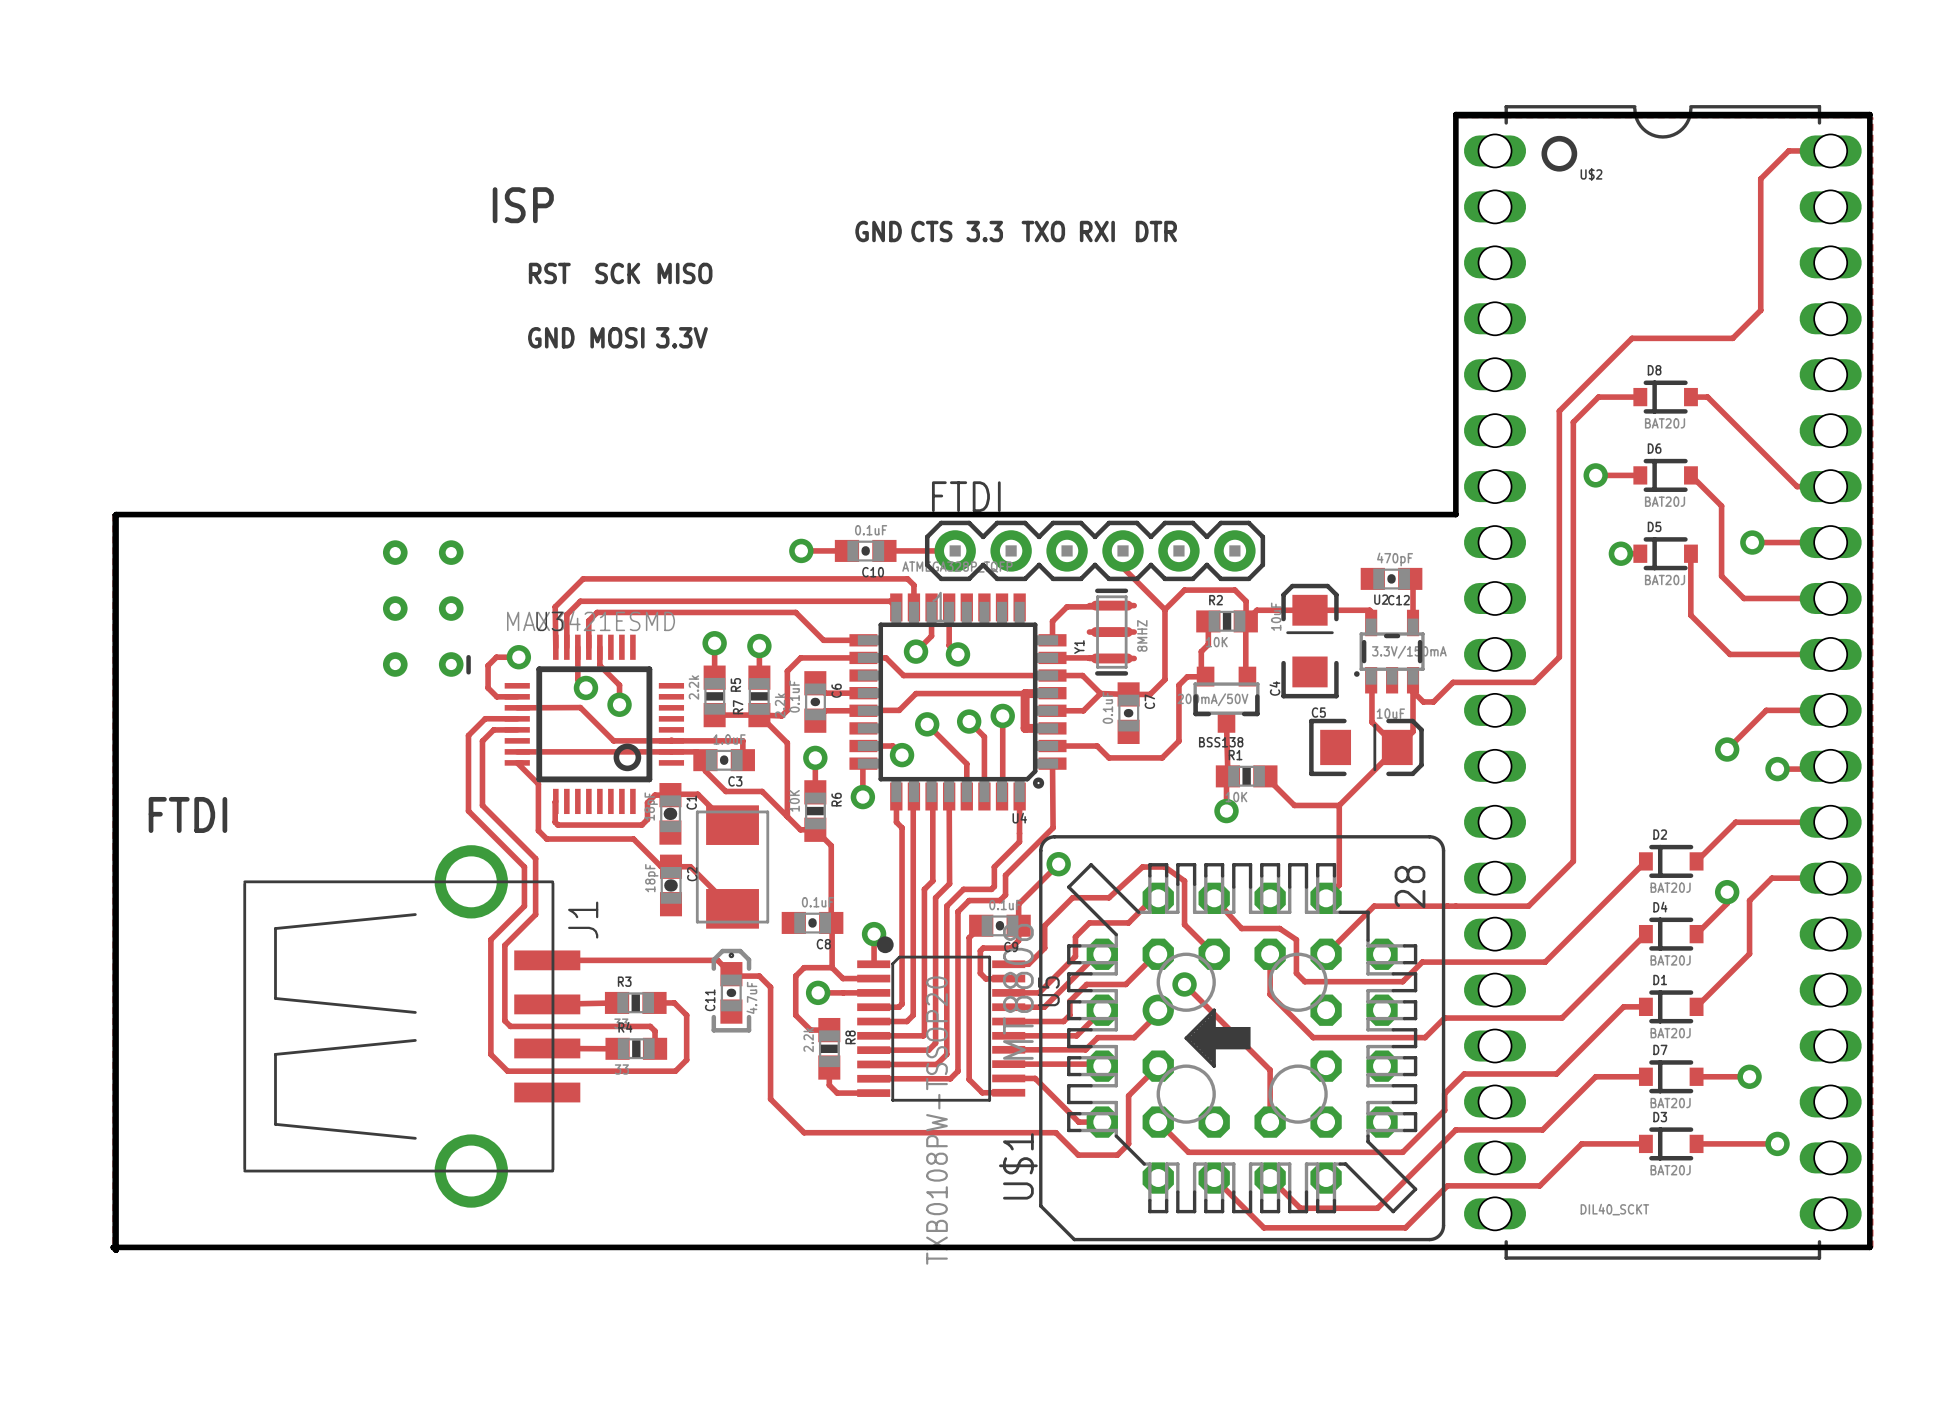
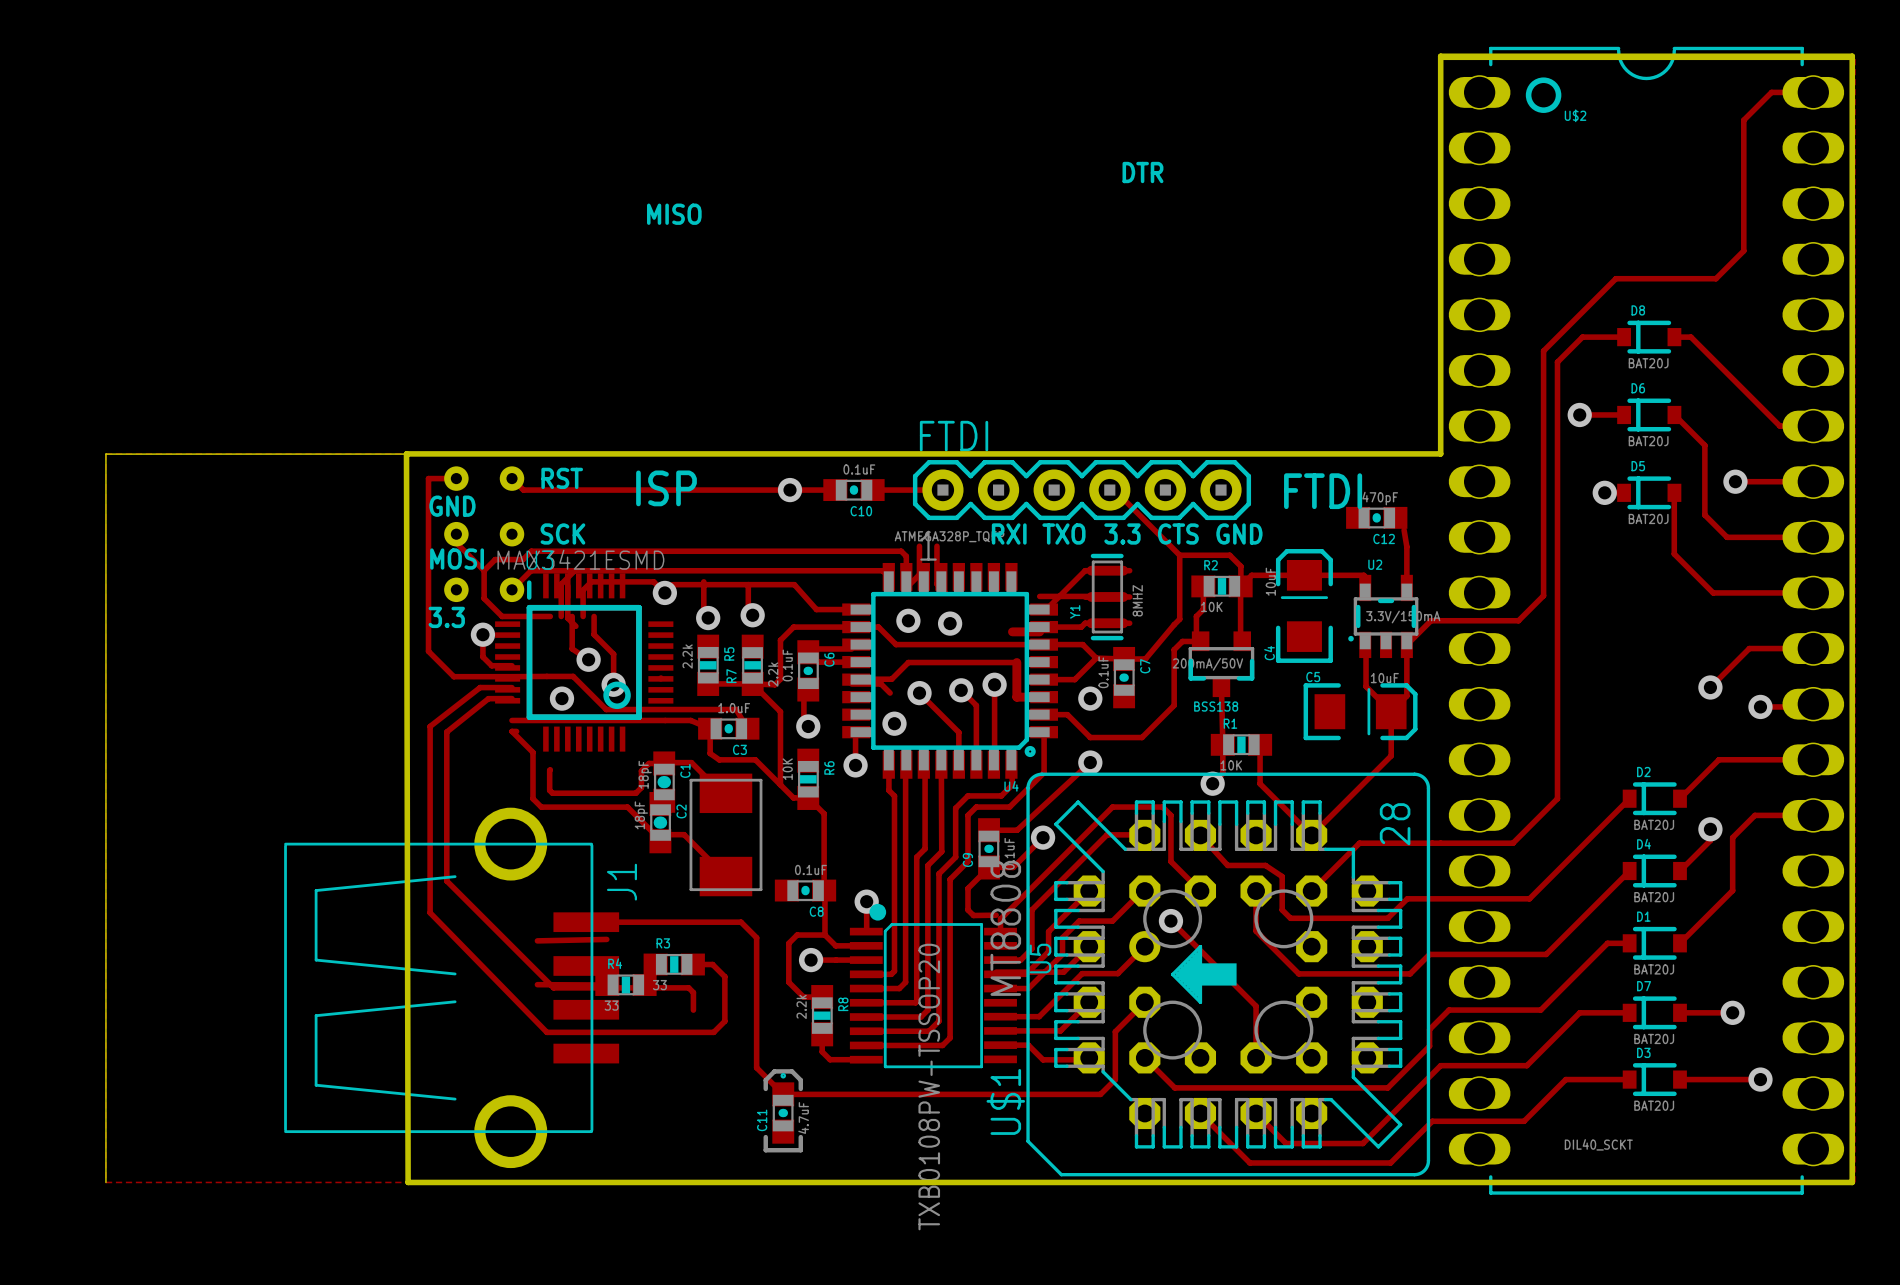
text position: ISP (523, 205) -> ISP (666, 488)
text: GND (878, 231) -> none
text position: CTS (931, 231) -> CTS (1178, 533)
text: 3.3 (984, 231) -> none
text position: TXO (1043, 231) -> TXO (1063, 533)
text position: RXI (1097, 231) -> RXI (1009, 533)
text position: RST (549, 273) -> RST (562, 478)
text position: SCK (617, 273) -> SCK (562, 533)
text position: GND (551, 337) -> GND (452, 506)
text position: MOSI (617, 337) -> MOSI (457, 559)
text: 3.3V (681, 337) -> none
board edge: (415, 514) (116, 514) (116, 1250) (113, 1247) (417, 1247) -> (406, 453) (408, 1182)
track: none -> (456, 478) (428, 478) (428, 651) (453, 676) (573, 676) (606, 709) (736, 709) (747, 728)
track: none -> (512, 478) (523, 490) (790, 490)
track: (1123, 550) (1123, 567) (1164, 609) -> none
track: none -> (1118, 490) (1118, 494) (1179, 555)
text: none -> FTDI (1323, 491)
track: (1410, 578) (1413, 581) (1413, 622) -> none
track: none -> (1404, 530) (1406, 546) (1406, 587)
track: none -> (456, 534) (456, 542) (484, 570)
text: none -> 3.3 (1122, 533)
text: none -> GND (1239, 533)
track: (1111, 605) (1067, 606) (1052, 621) (1052, 640) -> none
track: (896, 607) (890, 601) (580, 601) (566, 614) (566, 647) -> none
track: (913, 607) (913, 585) (907, 578) (583, 578) (555, 606) (555, 647) -> none
part position: (426, 608) -> (487, 534)
track: (1164, 609) (1164, 679) (1150, 694) (1100, 693) -> none
track: (1164, 609) (1184, 590) (1234, 590) (1246, 601) (1246, 621) -> none
track: (597, 612) (588, 620) (588, 647) -> (587, 551) (531, 551) (523, 559) (495, 559) (484, 570)
track: (795, 612) (823, 640) (863, 640) -> (784, 551) (901, 551) (906, 556) (906, 576)
track: none -> (1179, 555) (1179, 619) (1145, 659) (1096, 658)
track: none -> (1179, 555) (1229, 555) (1240, 566) (1240, 586)
track: (1208, 621) (1208, 644) (1201, 651) (1201, 672) (1205, 676) -> (1203, 586) (1203, 609) (1196, 616) (1196, 637) (1200, 641)
R2 position: (1227, 621) -> (1221, 586)
track: (1371, 622) (1371, 612) (1369, 610) (1256, 610) (1245, 621) (1245, 674) (1247, 676) -> (1365, 587) (1366, 577) (1363, 575) (1251, 575) (1240, 586) (1240, 639) (1242, 641)
track: none -> (484, 570) (484, 598) (502, 616) (550, 616)
track: none -> (574, 570) (561, 584) (561, 616)
track: none -> (1085, 570) (1046, 609) (1044, 609)
Y1 position: (1111, 632) -> (1107, 597)
track: none -> (888, 576) (882, 570) (531, 570) (512, 589)
C4 position: (1309, 641) -> (1304, 605)
via: (714, 643) -> none
via: (759, 646) -> none
track: (599, 647) (599, 665) (619, 685) (619, 704) -> none
via: (916, 651) -> none
U2 position: (1389, 651) -> (1383, 616)
via: none -> (664, 592)
via: (957, 654) -> none
track: (518, 657) (496, 657) (488, 665) (488, 687) (496, 696) (517, 696) -> none
via: (518, 657) -> none
track: none -> (856, 609) (816, 609) (794, 584) (673, 584) (664, 592) (653, 581) (591, 581) (583, 590) (583, 616)
via: none -> (752, 615)
track: (1205, 676) (1187, 676) (1178, 685) (1178, 741) (1162, 757) (1109, 757) (1097, 746) (1052, 746) -> none
track: none -> (572, 616) (572, 648) (588, 659)
track: none -> (594, 616) (594, 634) (613, 654) (613, 684)
text: none -> 3.3 (446, 617)
via: none -> (708, 618)
track: (1371, 680) (1371, 722) (1397, 747) -> (1365, 644) (1366, 686) (1391, 711)
via: none -> (908, 620)
track: (1453, 682) (1433, 701) (1423, 701) (1412, 690) (1412, 680) (1413, 680) (1413, 731) (1339, 805) -> (1437, 620) (1431, 620) (1406, 644)
track: (815, 683) (825, 693) (863, 693) -> (808, 652) (818, 662) (856, 662)
track: none -> (1085, 623) (1081, 627) (1044, 627)
via: none -> (950, 623)
via: (585, 687) -> none
track: (1100, 693) (1082, 675) (903, 675) (885, 657) (800, 657) (787, 671) (787, 710) (781, 715) (759, 715) -> none
track: (1100, 693) (1083, 710) (1052, 710) -> none
track: none -> (482, 634) (482, 656) (491, 665) (511, 665)
via: none -> (482, 634)
R5 position: (714, 696) -> (708, 665)
R7 position: (759, 696) -> (752, 665)
BSS138 position: (1226, 699) -> (1221, 664)
C6 position: (815, 701) -> (808, 670)
U4 position: (957, 701) -> (950, 670)
track: none -> (1200, 641) (1182, 641) (1174, 649) (1174, 705) (1142, 737) (1090, 737) (1067, 714) (1044, 714)
via: (619, 704) -> none
track: none -> (1406, 644) (1406, 696) (1391, 711)
track: (517, 707) (580, 707) (613, 740) (742, 740) (742, 760) -> none
track: (863, 710) (899, 710) (916, 693) (1025, 693) (1025, 728) (1052, 728) -> (856, 679) (891, 679) (908, 662) (1016, 662) (1016, 697) (1044, 697)
C7 position: (1128, 713) -> (1124, 677)
track: (714, 715) (759, 715) -> (708, 683) (752, 683)
track: (759, 715) (787, 743) (787, 816) -> (752, 683) (780, 711) (780, 784)
track: (1002, 715) (1002, 796) -> (994, 684) (993, 764)
via: (1002, 715) -> none
track: (517, 718) (485, 718) (468, 735) (468, 811) (524, 867) (524, 906) (490, 939) (490, 1054) (507, 1071) (675, 1071) (686, 1060) (686, 1015) (674, 1002) (654, 1002) -> none
track: none -> (1096, 658) (1082, 644) (896, 644) (878, 627) (793, 627) (780, 640) (780, 679) (774, 684) (752, 683)
track: none -> (1096, 658) (1074, 679) (1044, 679)
via: none -> (588, 659)
track: (969, 721) (984, 736) (984, 796) -> (961, 690) (976, 705) (976, 764)
via: (969, 721) -> none
track: (1226, 722) (1226, 811) -> none
track: (927, 724) (966, 763) (966, 796) -> (919, 693) (958, 732) (958, 764)
via: (927, 724) -> none
track: (517, 729) (493, 729) (482, 741) (482, 805) (535, 858) (535, 914) (504, 945) (504, 1020) (510, 1026) (650, 1026) (655, 1031) (655, 1048) -> none
via: none -> (613, 684)
via: none -> (994, 684)
C5 position: (1366, 747) -> (1360, 711)
track: none -> (511, 687) (480, 687) (430, 726) (430, 912) (546, 1032) (713, 1032) (724, 1021) (724, 976) (712, 964) (692, 964)
track: none -> (1221, 687) (1222, 773) (1212, 783)
track: (517, 751) (697, 751) (705, 760) (705, 771) (725, 791) (762, 791) (800, 829) (815, 829) (831, 845) (832, 967) -> none
via: none -> (961, 690)
via: (902, 755) -> none
via: none -> (919, 693)
via: (815, 757) -> none
track: none -> (511, 698) (488, 698) (446, 732) (446, 881) (553, 987) (688, 987) (693, 992) (693, 1010)
via: none -> (561, 698)
C3 position: (724, 760) -> (728, 728)
via: none -> (1090, 698)
track: (521, 762) (517, 762) (538, 784) (538, 830) (546, 839) (633, 839) (661, 866) (690, 866) (732, 908) -> (516, 731) (511, 731) (533, 752) (533, 798) (541, 807) (627, 807) (655, 834) (684, 834) (725, 876)
track: (863, 763) (862, 797) -> (856, 732) (855, 765)
track: (1052, 763) (1053, 827) (1005, 875) (1005, 894) (999, 900) (969, 900) (957, 911) (957, 1071) (950, 1078) (873, 1078) -> none
R1 position: (1246, 776) -> (1241, 744)
track: (1265, 776) (1294, 805) (1339, 805) -> none
track: none -> (511, 720) (690, 720) (710, 728) (710, 753) (719, 759) (755, 759) (793, 797) (808, 797) (824, 813) (824, 935)
via: none -> (894, 723)
via: none -> (808, 726)
track: none -> (1044, 732) (1044, 772) (1009, 807) (976, 807) (967, 815) (967, 861) (950, 879) (950, 1037) (942, 1045) (866, 1045)
track: (896, 796) (896, 822) (902, 827) (902, 1004) (898, 1007) (873, 1007) -> (888, 764) (888, 790) (894, 796) (894, 971) (891, 974) (866, 974)
track: (913, 796) (913, 1015) (906, 1021) (873, 1021) -> (906, 764) (905, 982) (899, 988) (866, 988)
track: (931, 796) (932, 880) (924, 889) (924, 1034) (873, 1035) -> (923, 764) (925, 848) (916, 857) (916, 1001) (866, 1002)
track: (949, 796) (949, 883) (935, 897) (935, 1043) (928, 1050) (873, 1050) -> (941, 764) (941, 851) (927, 865) (927, 1010) (920, 1017) (866, 1017)
track: (1019, 796) (1019, 841) (994, 867) (994, 886) (991, 889) (963, 889) (946, 906) (946, 1054) (936, 1064) (873, 1064) -> none
via: (862, 797) -> none
track: (555, 801) (555, 822) (558, 825) (641, 825) (647, 819) (647, 802) (655, 795) (697, 794) (728, 825) (732, 825) -> (550, 769) (549, 790) (552, 793) (635, 793) (641, 787) (641, 770) (648, 763) (691, 762) (722, 793) (725, 793)
track: (1339, 805) (1339, 885) -> (1391, 711) (1391, 755) (1324, 822)
track: none -> (1260, 744) (1260, 783) (1311, 835)
R6 position: (815, 811) -> (808, 779)
via position: (1226, 811) -> (1212, 783)
C1 position: (670, 813) -> (664, 782)
text: FTDI (187, 814) -> none
track: none -> (1090, 762) (1017, 830) (989, 830)
via: none -> (1090, 762)
via: none -> (855, 765)
track: none -> (1011, 764) (1012, 784) (1001, 795) (967, 795) (955, 808) (955, 857) (938, 873) (938, 1021) (928, 1031) (866, 1031)
track: (1058, 864) (1018, 904) (1018, 940) (1011, 948) (983, 948) (980, 951) -> (1043, 837) (1013, 867) (989, 867) (967, 888)
via: (1058, 864) -> none
part position: (732, 867) -> (725, 834)
track: (1184, 880) (1164, 867) (1142, 867) (1109, 897) (1072, 897) (1044, 925) (1044, 948) (1028, 964) (1008, 964) -> (1170, 818) (1170, 815) (1162, 807) (1112, 807) (1000, 919) (1000, 931)
track: (1158, 898) (1153, 898) (1128, 922) (1089, 922) (1075, 936) (1075, 956) (1039, 992) (1008, 992) -> (1144, 835) (1107, 834) (1031, 909) (1031, 948) (1020, 960) (1000, 960)
via: none -> (1043, 837)
C8 position: (812, 922) -> (805, 890)
track: (981, 925) (969, 937) (969, 1079) (982, 1092) (1008, 1092) -> none
C9 rotation: 0° (999, 925) -> 90° clockwise (989, 848)
track: (874, 934) (873, 964) -> (866, 901) (866, 931)
via position: (874, 934) -> (866, 901)
track: (1102, 954) (1097, 954) (1044, 1007) (1008, 1007) -> (1089, 891) (1048, 931) (1048, 951) (1025, 974) (1000, 974)
track: (547, 960) (717, 960) (733, 976) (759, 976) (770, 987) (770, 1099) (804, 1132) (1055, 1132) (1078, 1155) (1117, 1155) -> (586, 922) (741, 922) (756, 937) (756, 1067) (783, 1094) (1100, 1094) (1104, 1090)
track: (832, 967) (842, 978) (873, 978) -> (824, 935) (835, 945) (866, 945)
track: (832, 967) (804, 967) (795, 976) (795, 1015) (810, 1030) (829, 1030) -> (824, 935) (797, 935) (788, 943) (788, 982) (803, 997) (822, 997)
track: (1092, 984) (1086, 984) (1069, 1001) (1069, 1015) (1063, 1021) (1008, 1021) -> (1079, 921) (1062, 937) (1062, 954) (1028, 988) (1000, 988)
C11 position: (731, 990) -> (783, 1110)
track: (818, 992) (873, 992) -> (811, 960) (866, 960)
via position: (818, 992) -> (811, 960)
R3 position: (635, 1002) -> (674, 964)
track: (1158, 1010) (1158, 1013) (1134, 1037) (1097, 1037) (1085, 1049) (1008, 1049) -> (1144, 946) (1117, 973) (1082, 973) (1039, 1016) (1000, 1016)
U5 position: (941, 1019) -> (933, 986)
J1 position: (411, 1026) -> (451, 987)
R8 position: (829, 1048) -> (822, 1015)
track: (1008, 1064) (1100, 1064) (1102, 1066) -> (1000, 1030) (1060, 1030) (1089, 1002)
track: (829, 1067) (829, 1085) (837, 1093) (873, 1093) -> (822, 1034) (822, 1051) (830, 1059) (866, 1059)
track: (1008, 1078) (1035, 1078) (1078, 1122) (1102, 1122) -> (1000, 1045) (1028, 1045) (1043, 1059) (1087, 1059) (1089, 1057)

